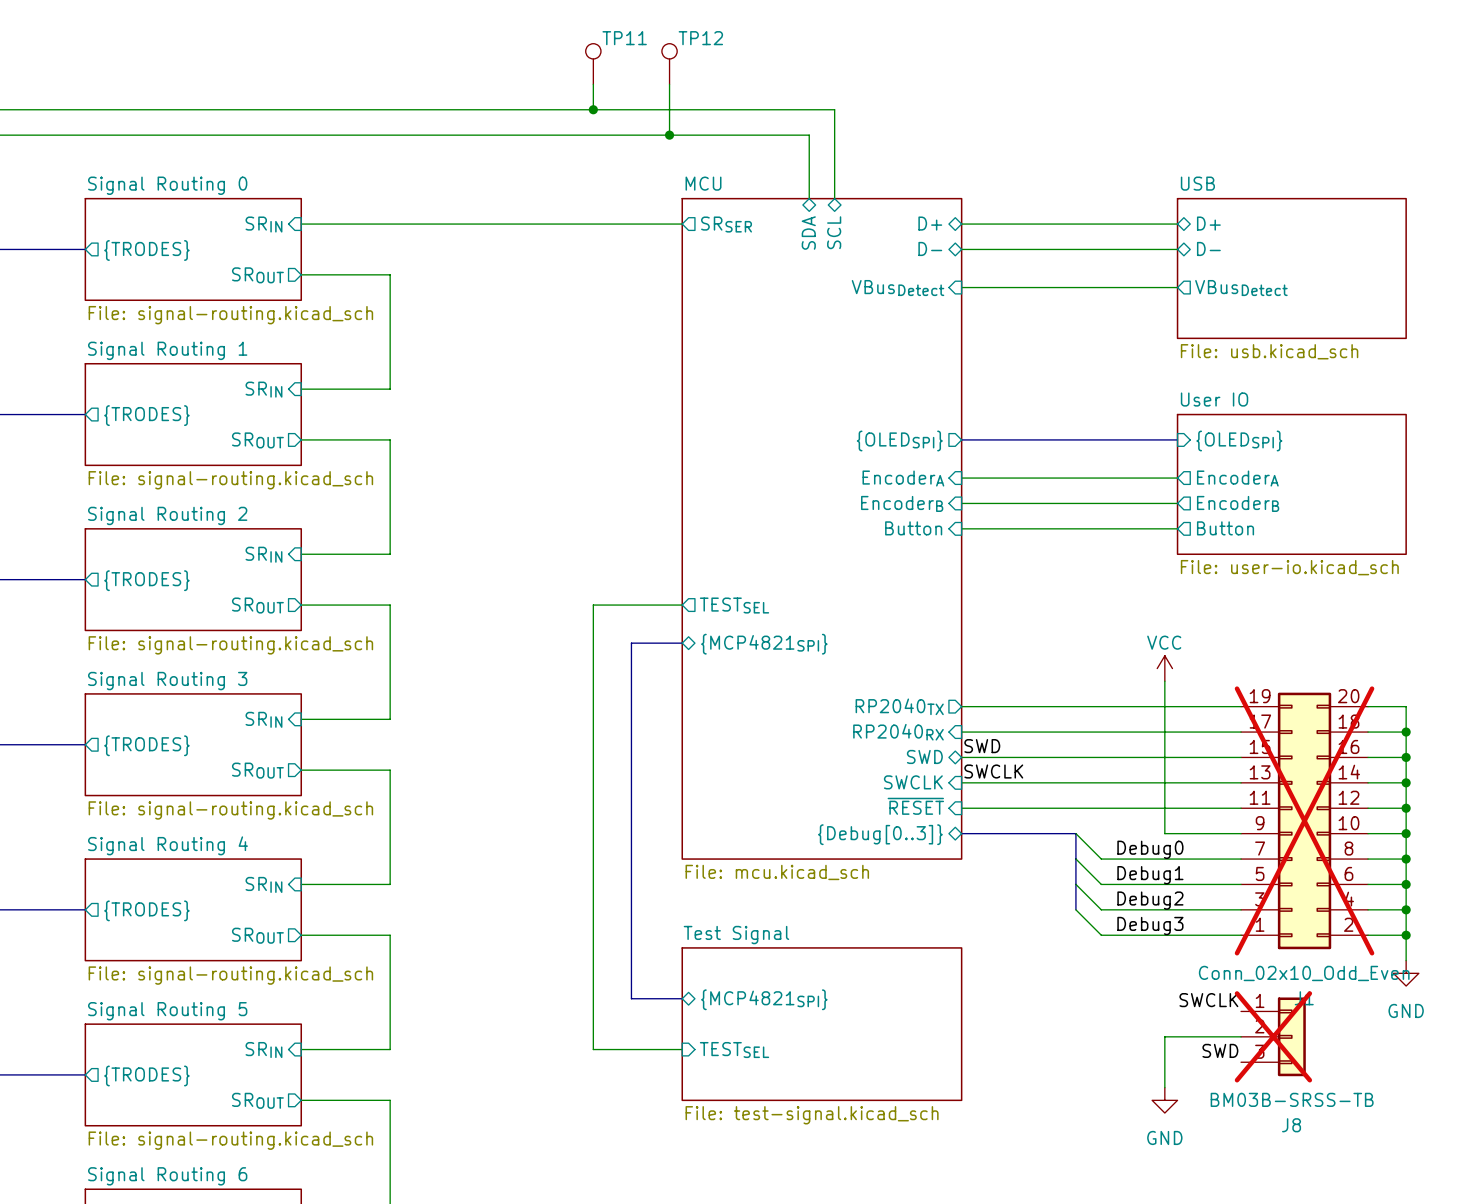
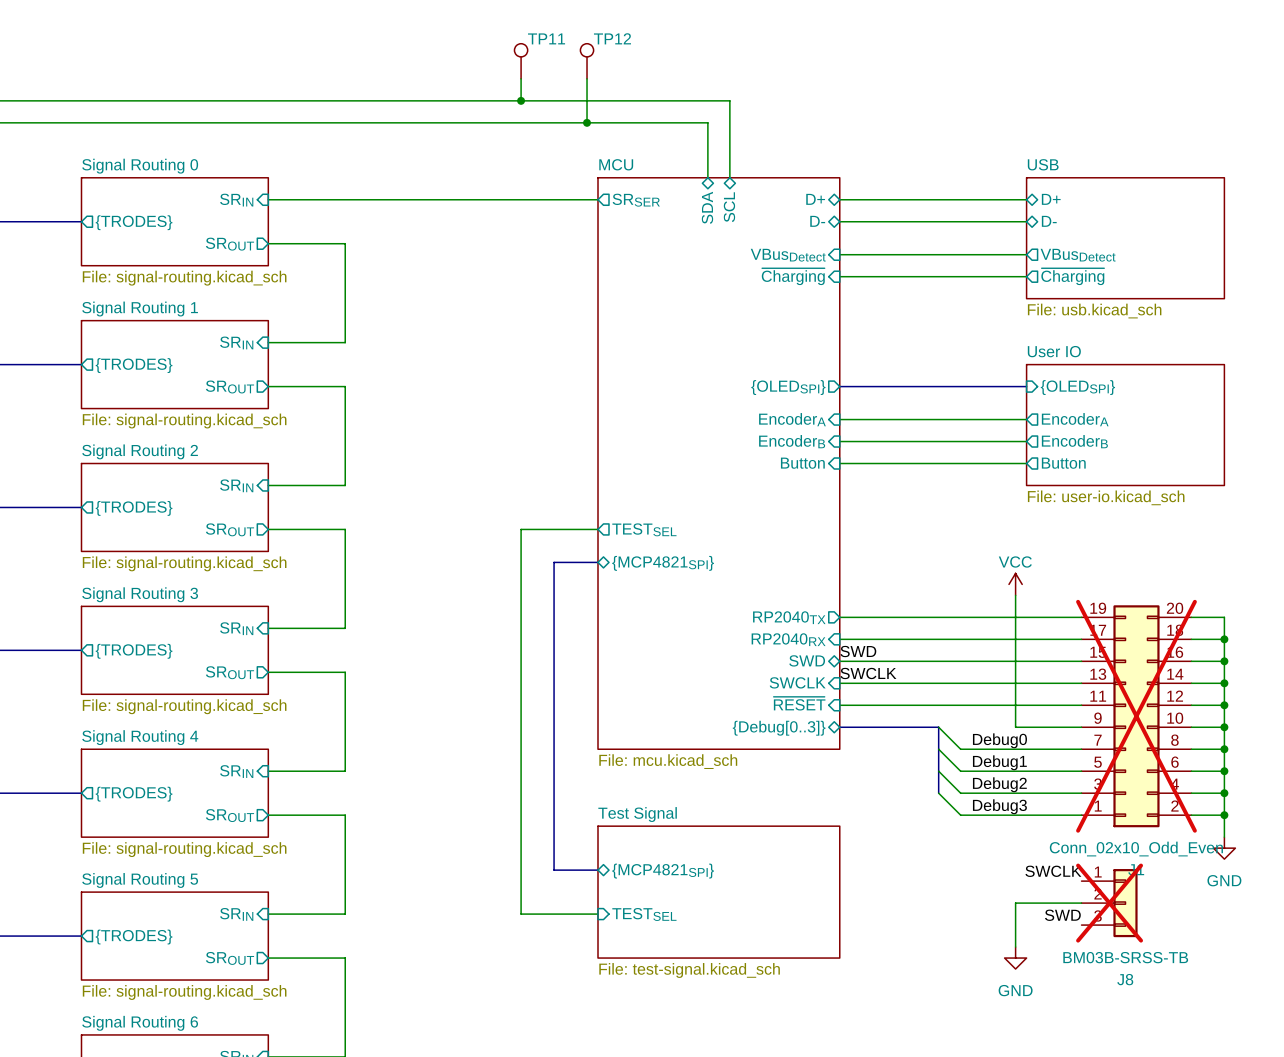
wire: none -> (839, 276) (1026, 276)
sheet pin: none -> ~{Charging} (793, 276)
sheet pin: none -> ~{Charging} (1072, 276)

